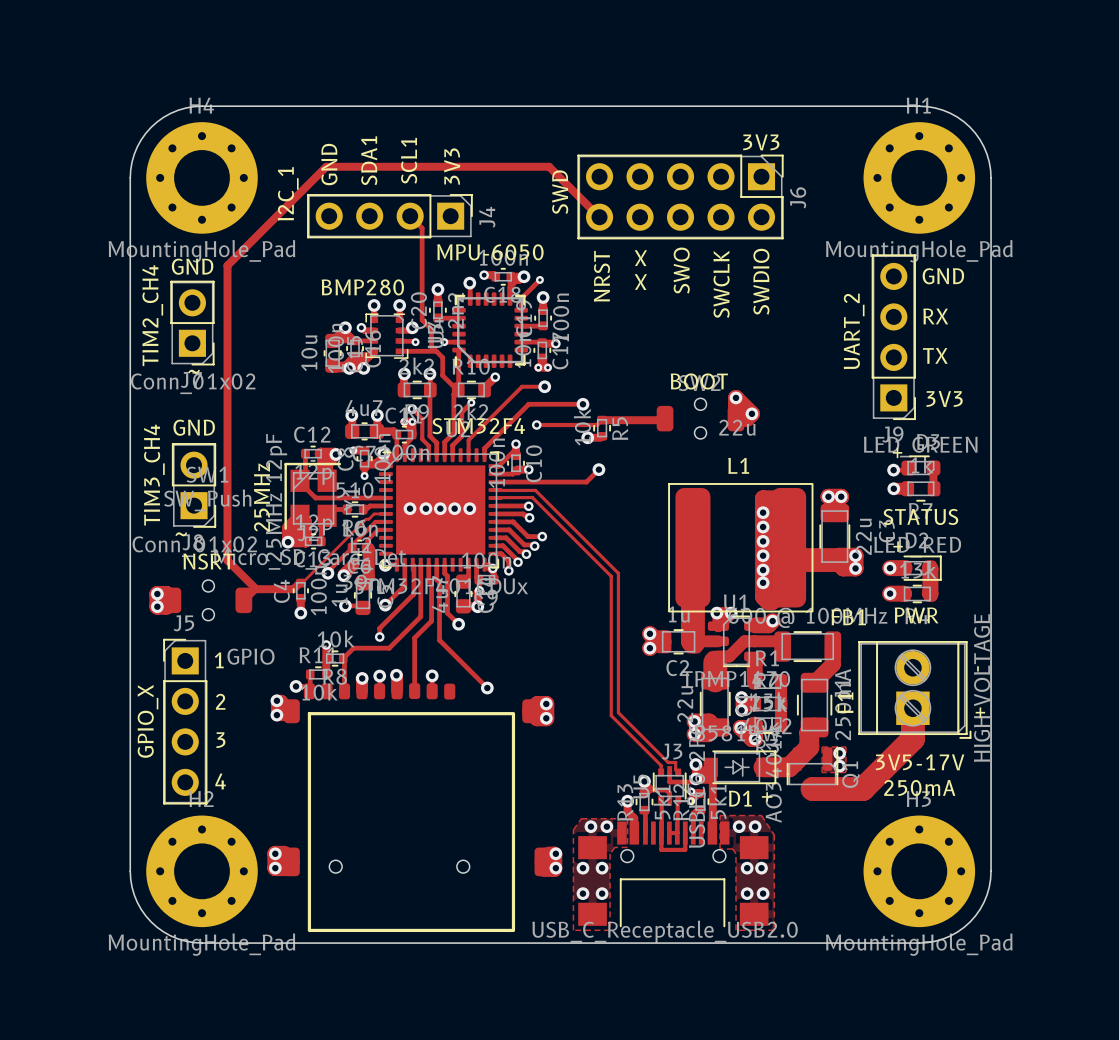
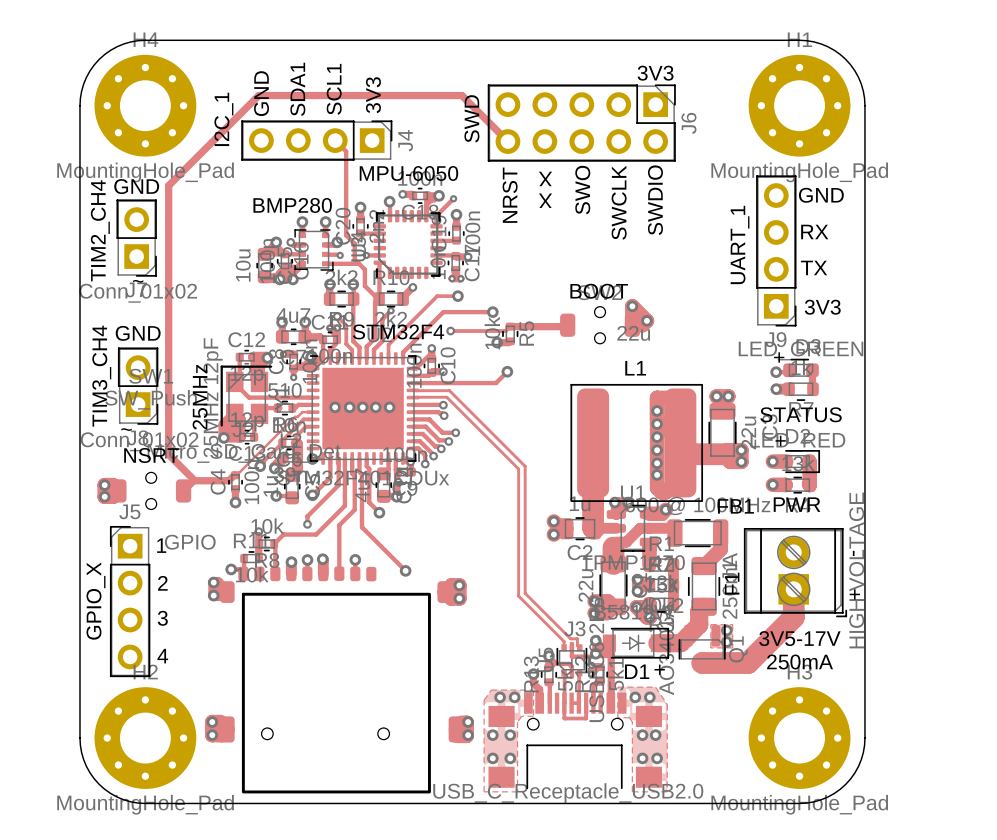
J9 value: UART_2 (854, 331) -> UART_1 (740, 244)

